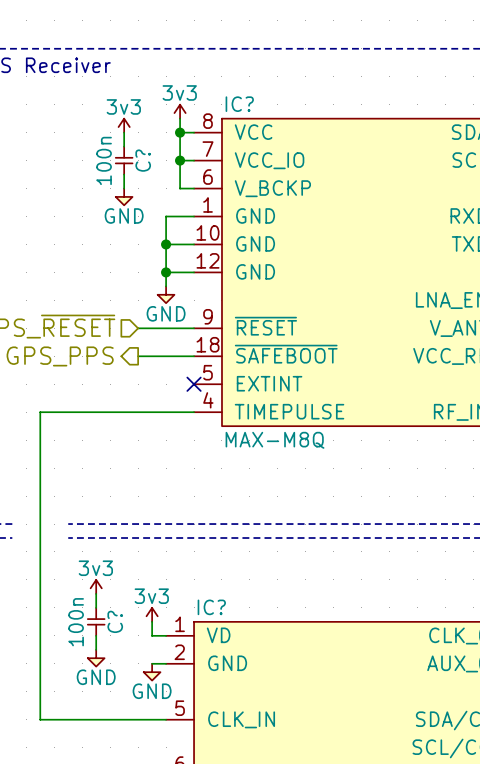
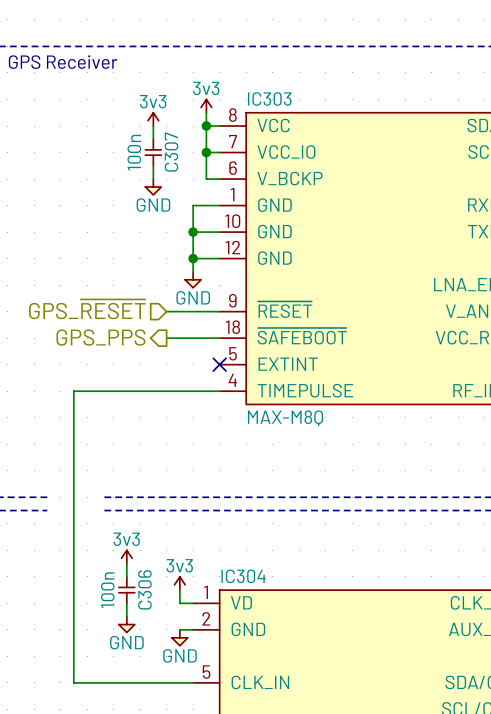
IC? name: IC? (239, 104) -> IC303 (269, 99)
C? name: C? (143, 160) -> C307 (171, 152)
IC? name: IC? (211, 607) -> IC304 (243, 576)
C? name: C? (115, 621) -> C306 (144, 589)

